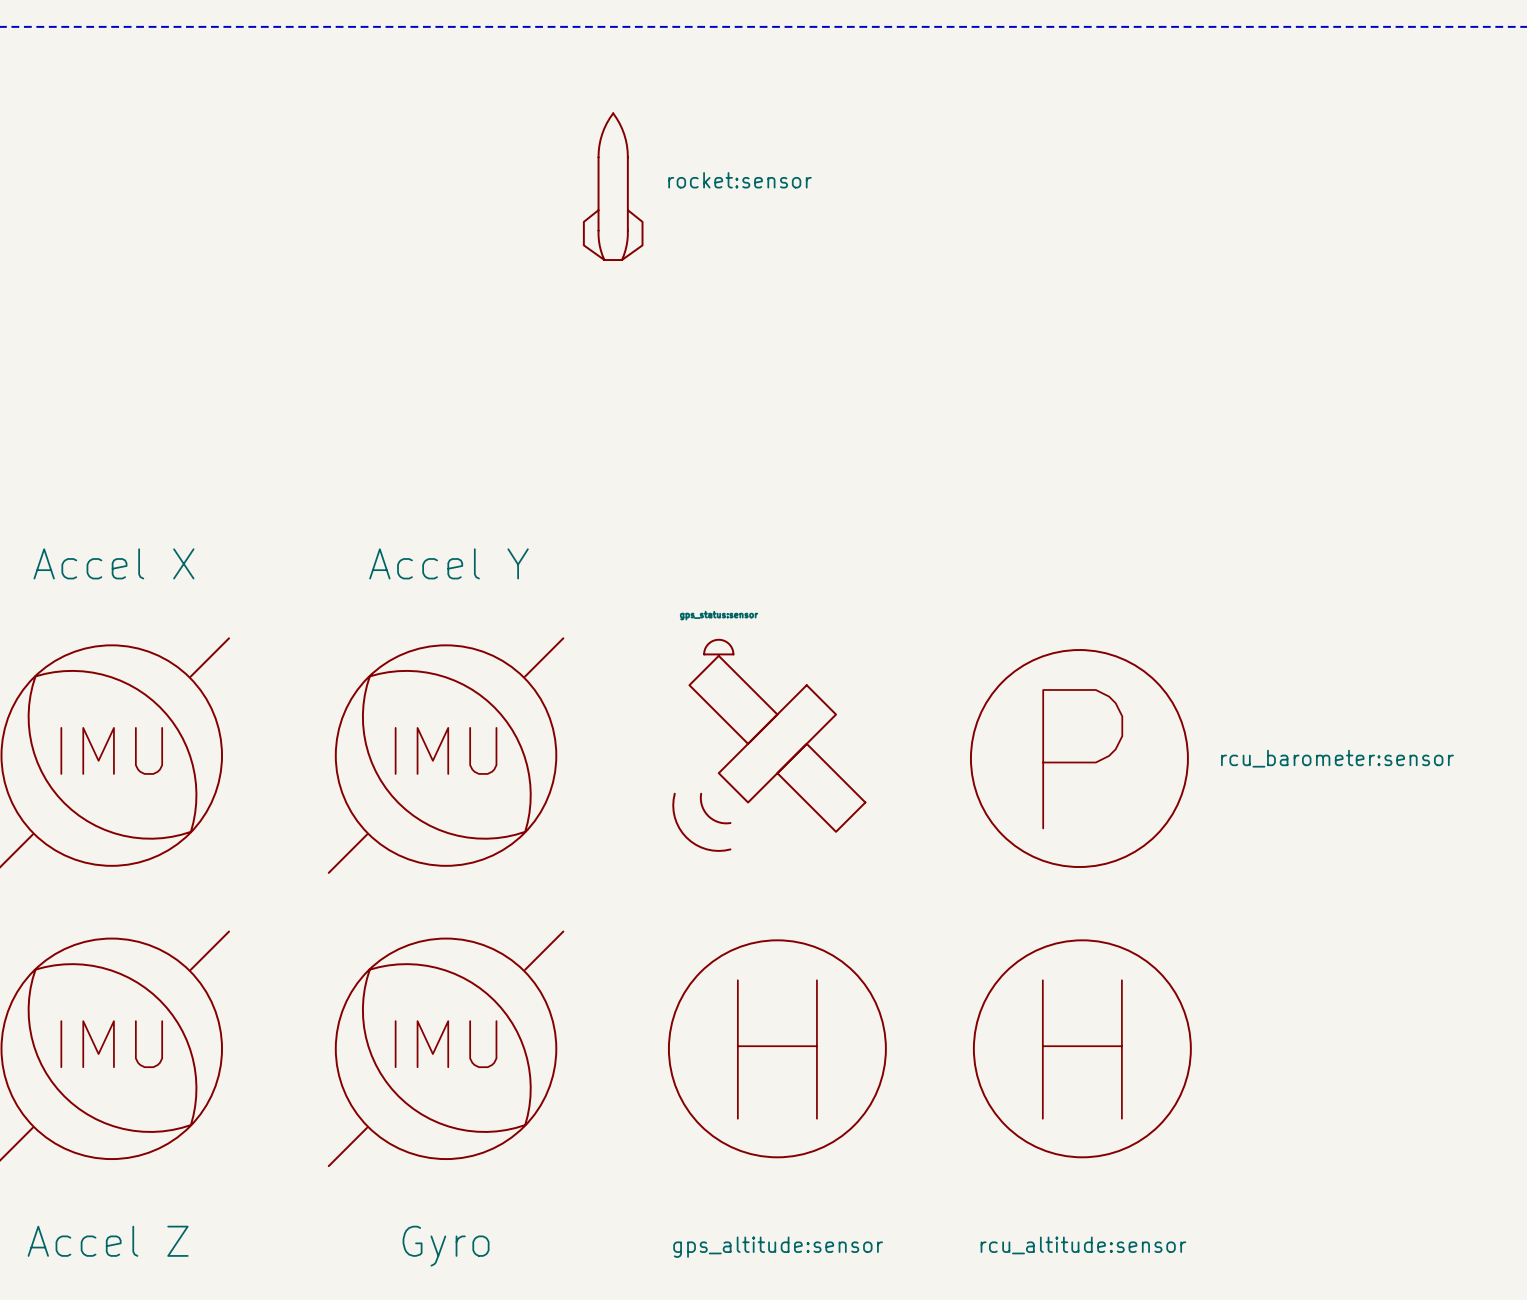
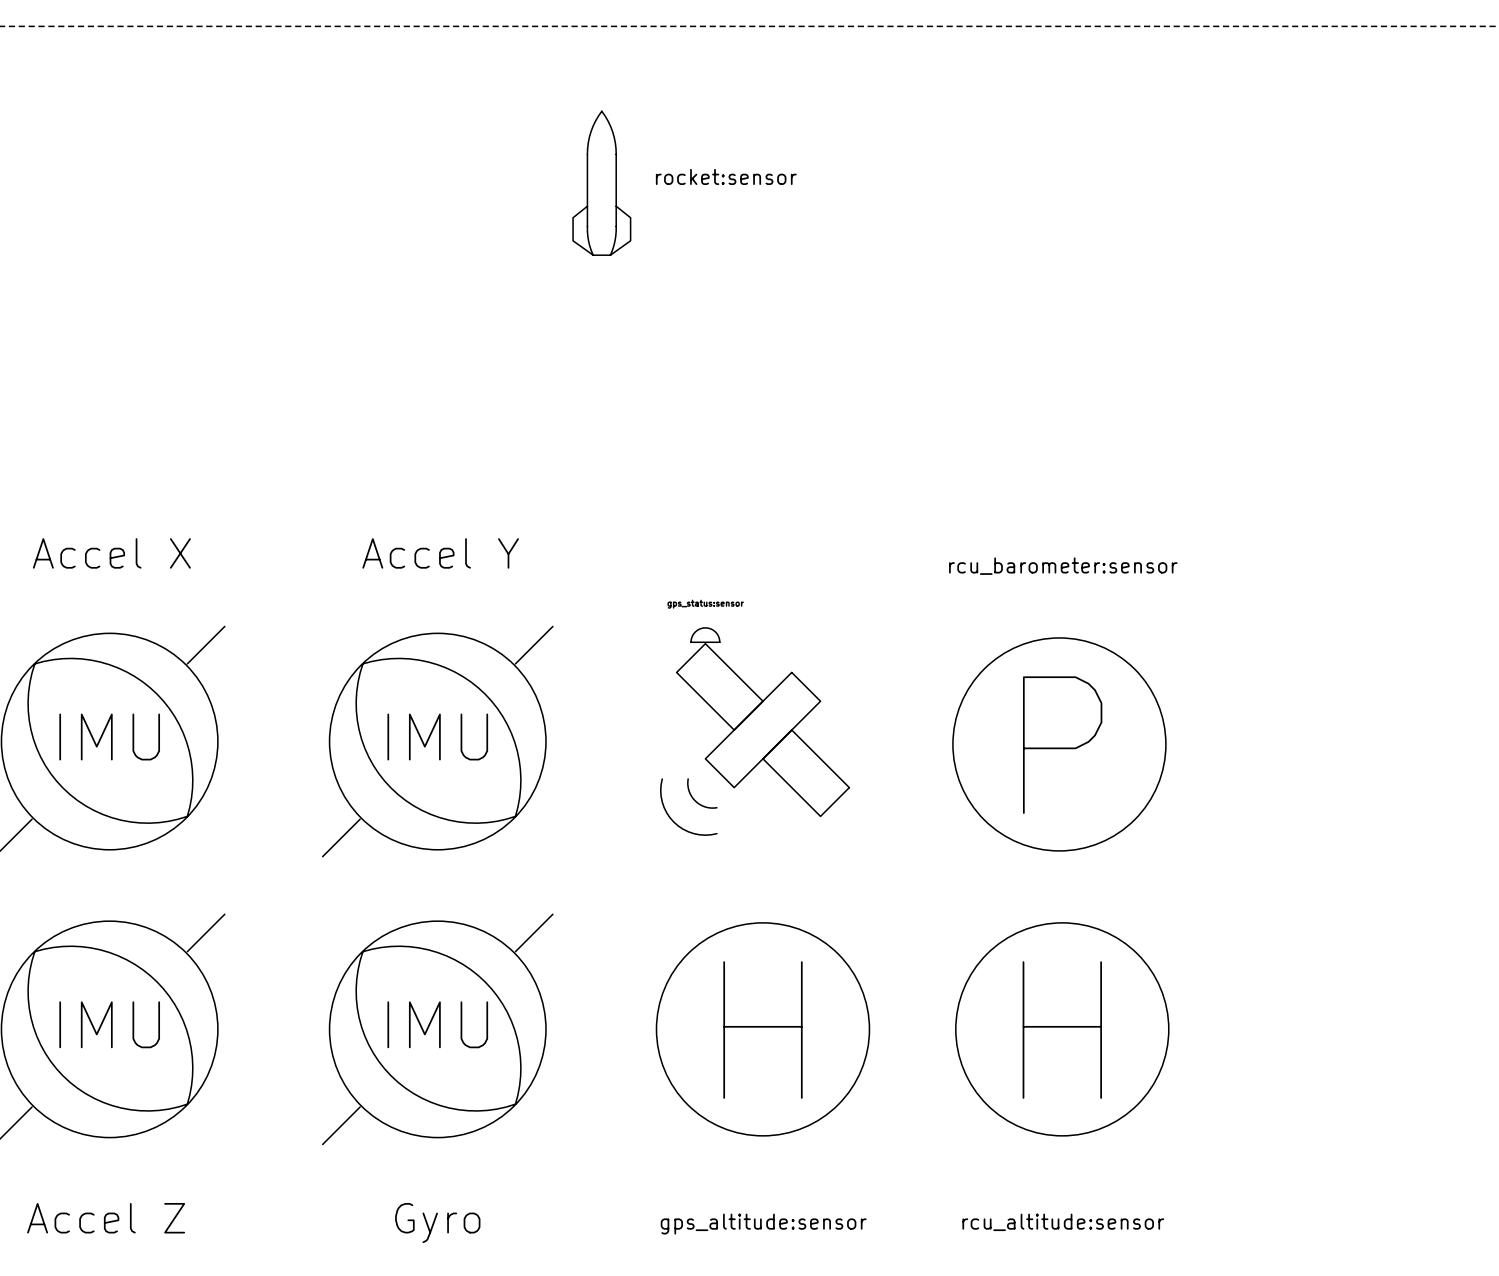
part value position: rcu_barometer:sensor (1337, 758) -> rcu_barometer:sensor (1063, 566)

